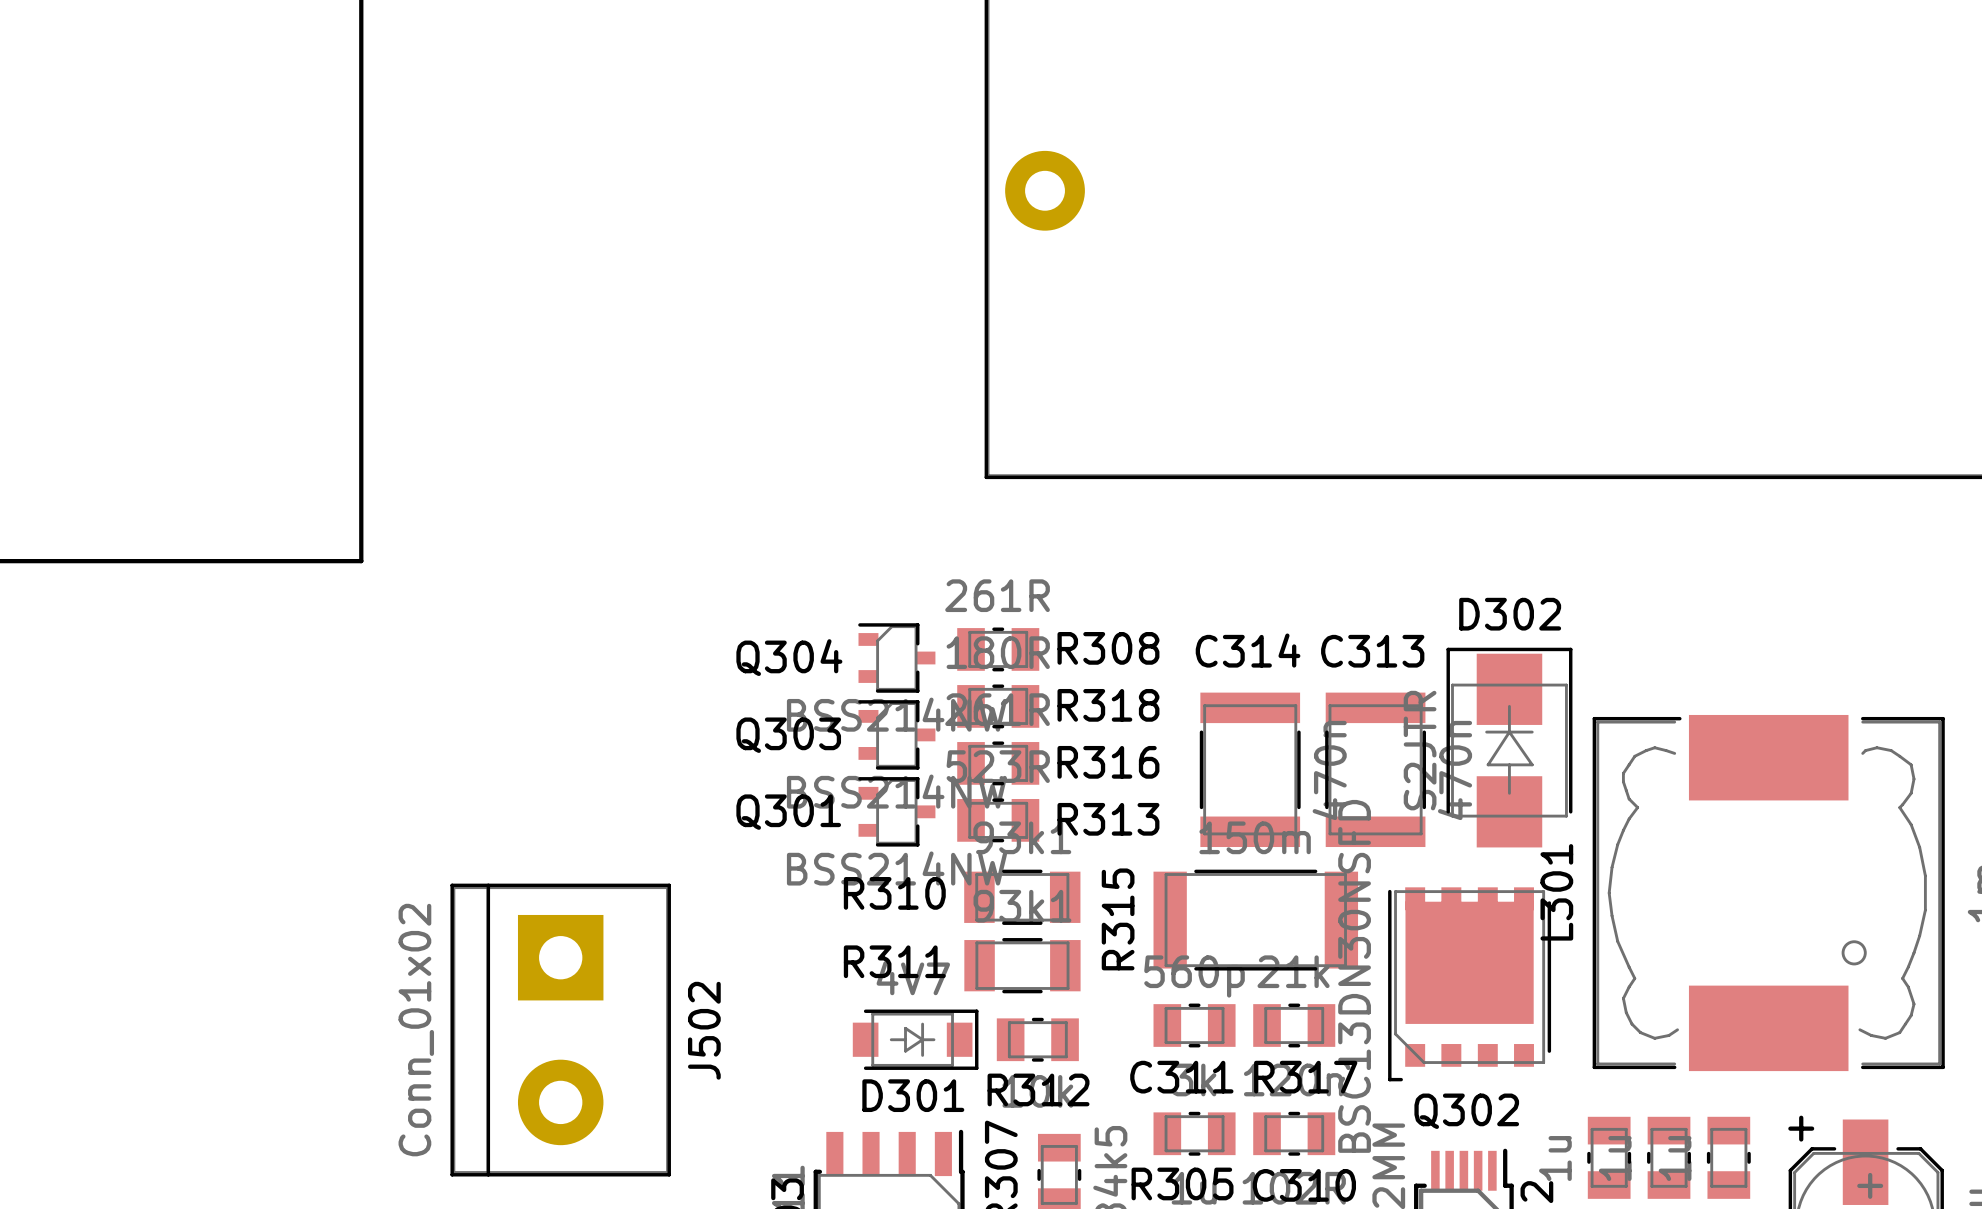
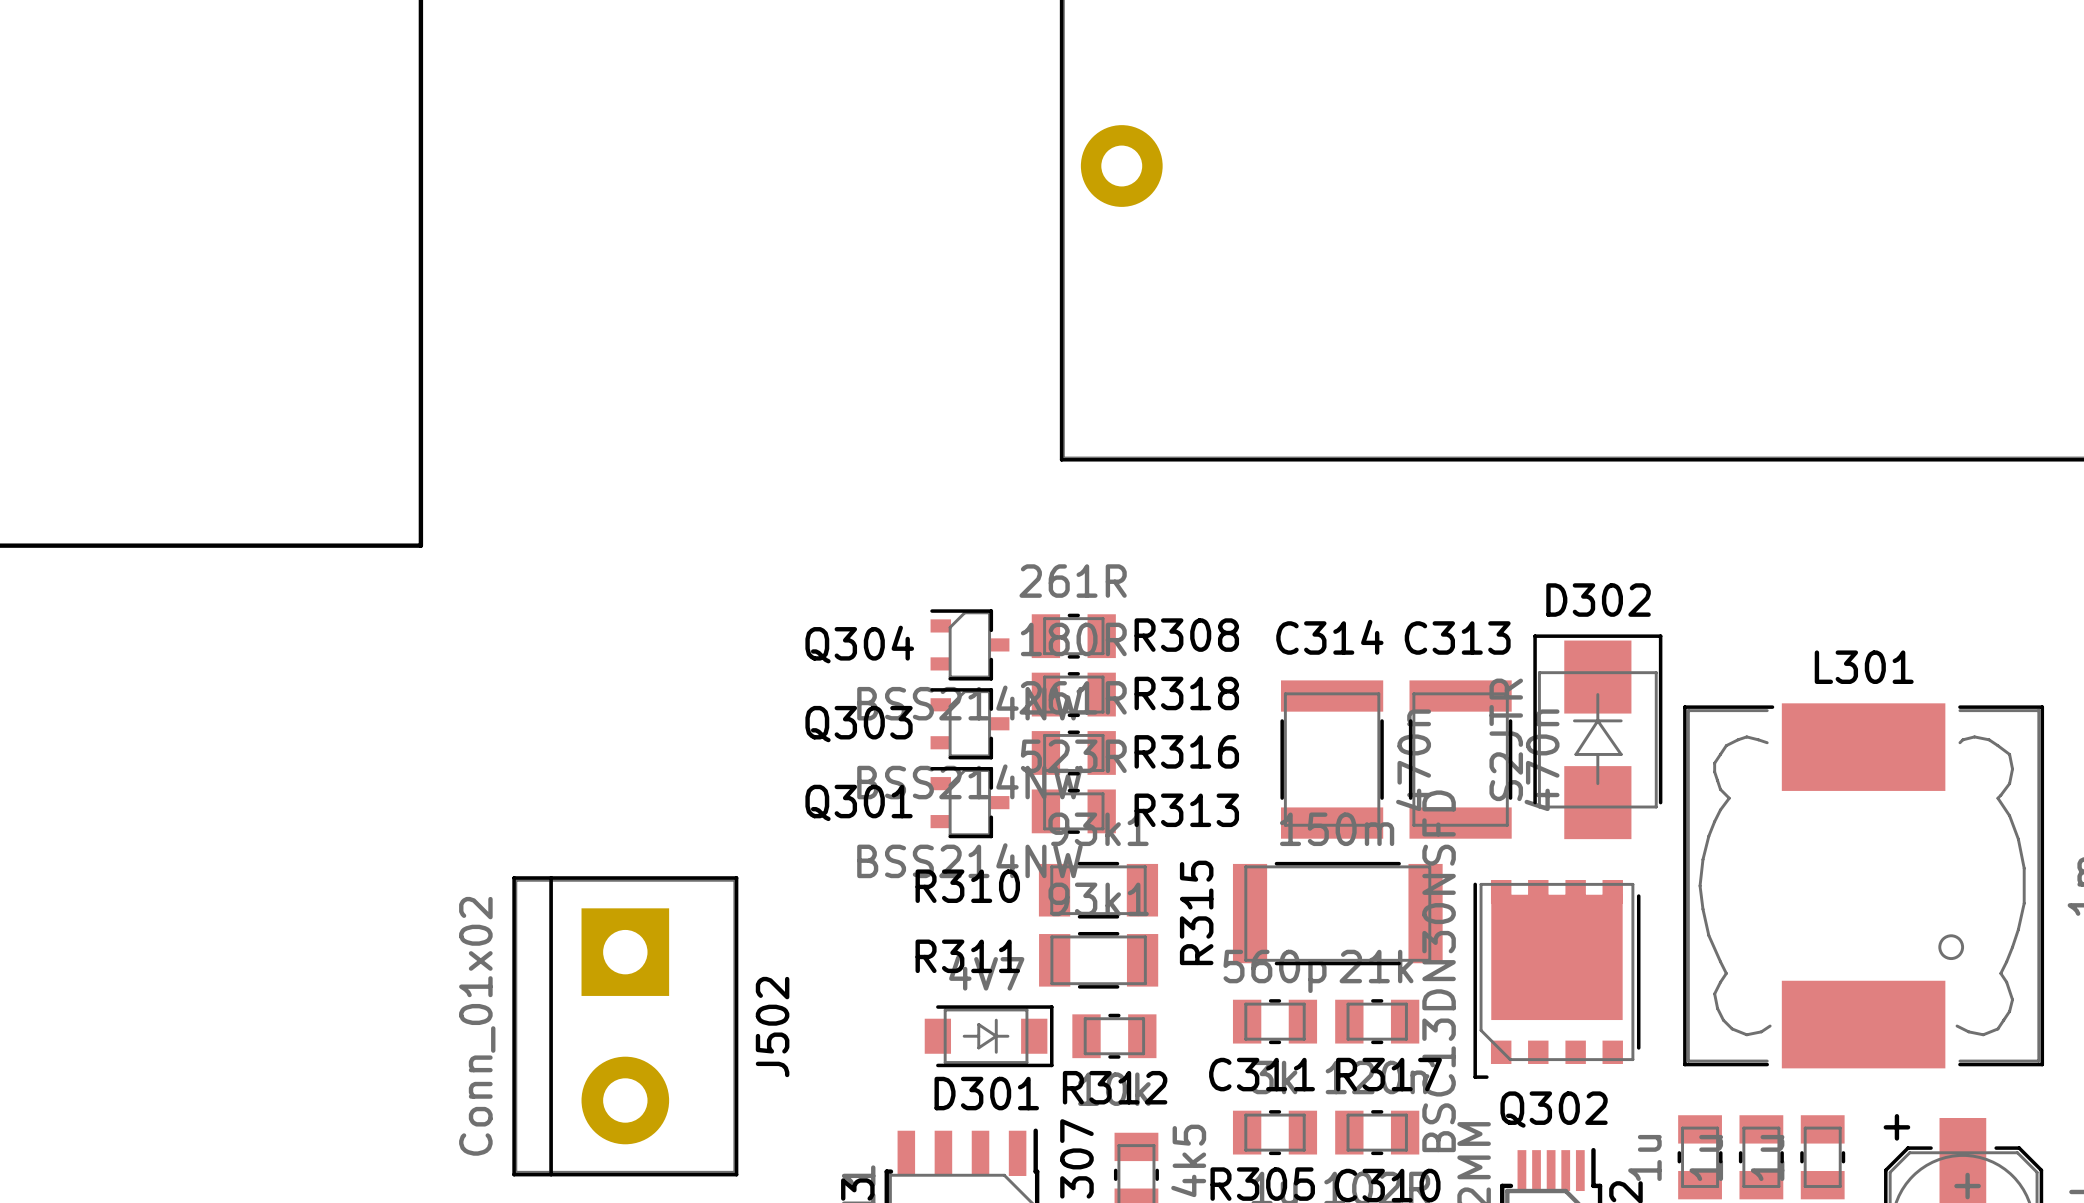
L301 name rotation: 0° (1556, 892) -> 90° clockwise (1864, 667)
L301 name position: L301 (1556, 892) -> L301 (1864, 667)

